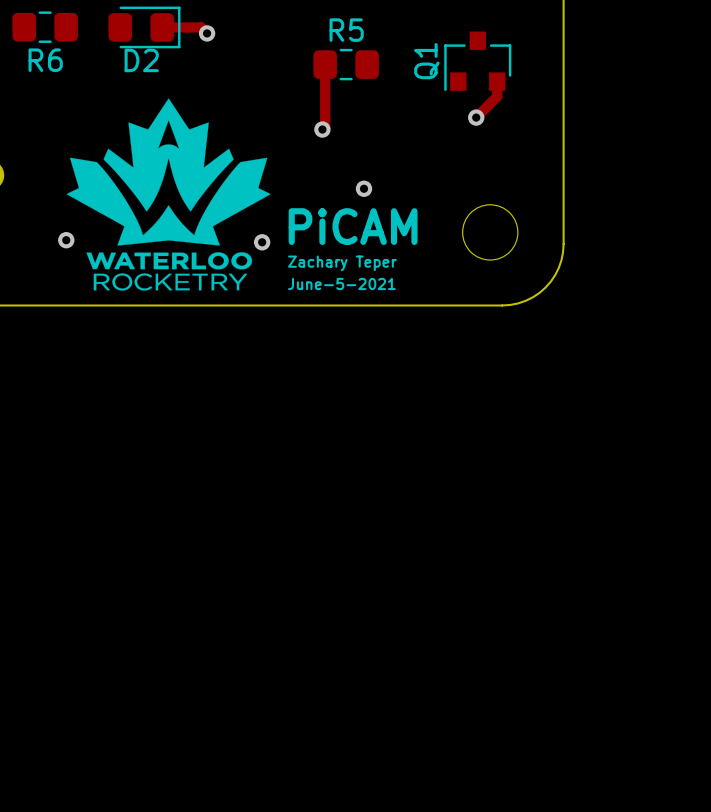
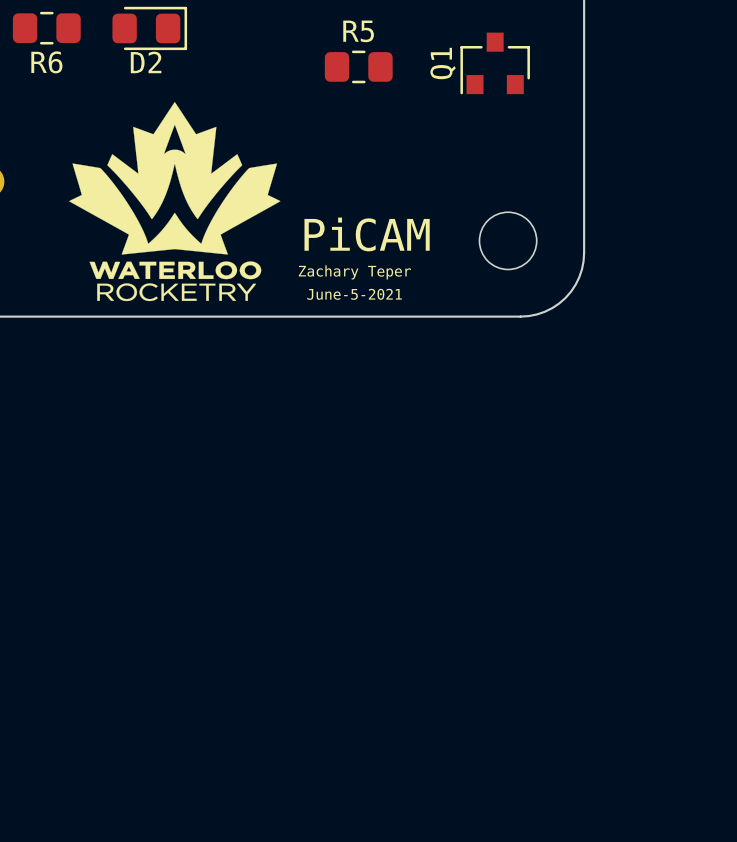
track: (162, 27) (201, 27) (207, 33) -> none
via: (207, 33) -> none
track: (325, 64) (325, 126) (322, 129) -> none
track: (497, 81) (497, 96) (476, 117) -> none
via: (476, 117) -> none
via: (322, 129) -> none
via: (364, 188) -> none
via: (66, 240) -> none
via: (262, 242) -> none

